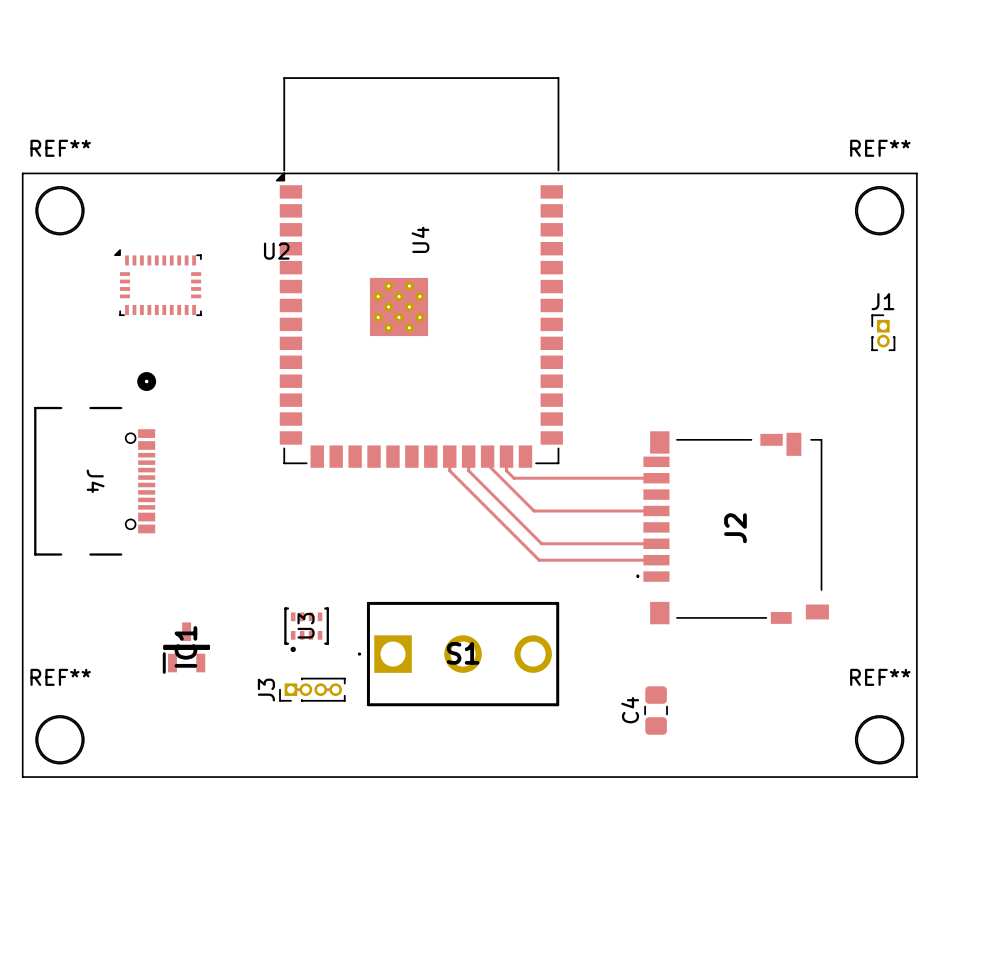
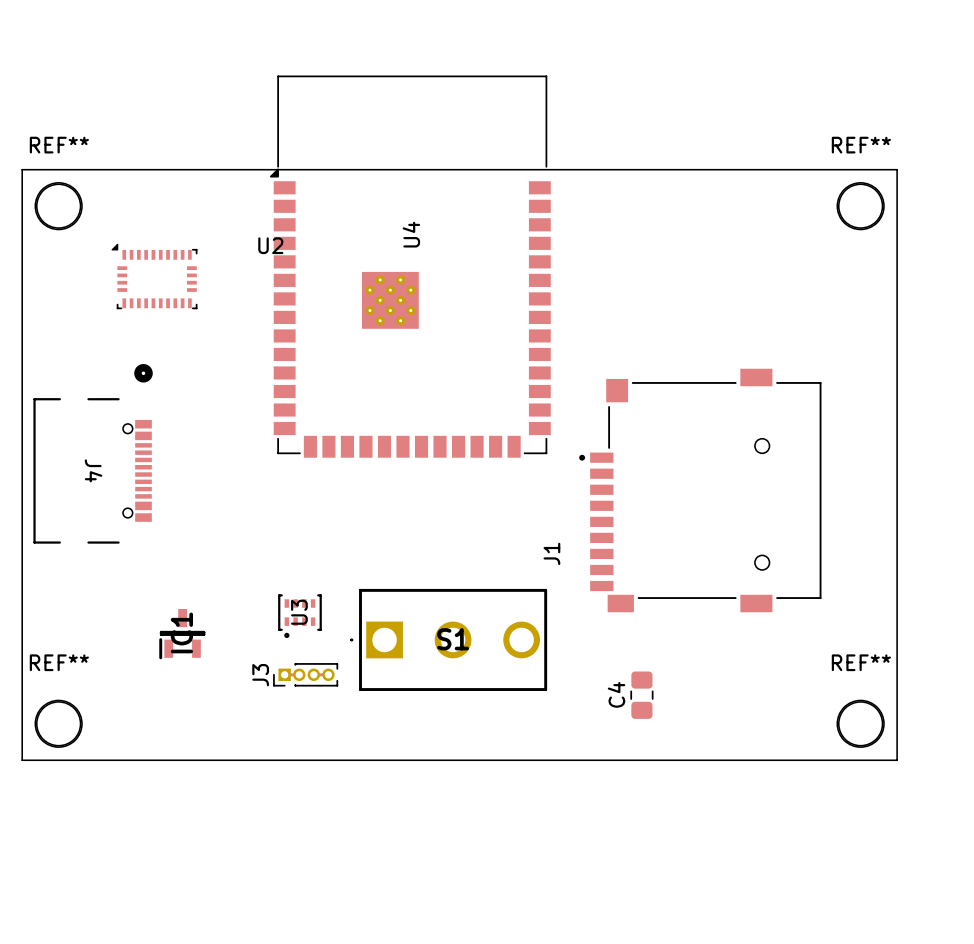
J1 name position: J1 (882, 301) -> J1 (551, 553)
J1 footprint: [871, 314, 896, 352] -> [579, 368, 822, 613]
top track: (449, 456) (449, 470) (539, 560) (656, 560) -> none
top track: (468, 456) (468, 470) (541, 543) (656, 543) -> none
top track: (487, 456) (487, 464) (534, 511) (656, 511) -> none
top track: (506, 456) (506, 470) (513, 478) (656, 478) -> none
J2: (732, 527) -> none

